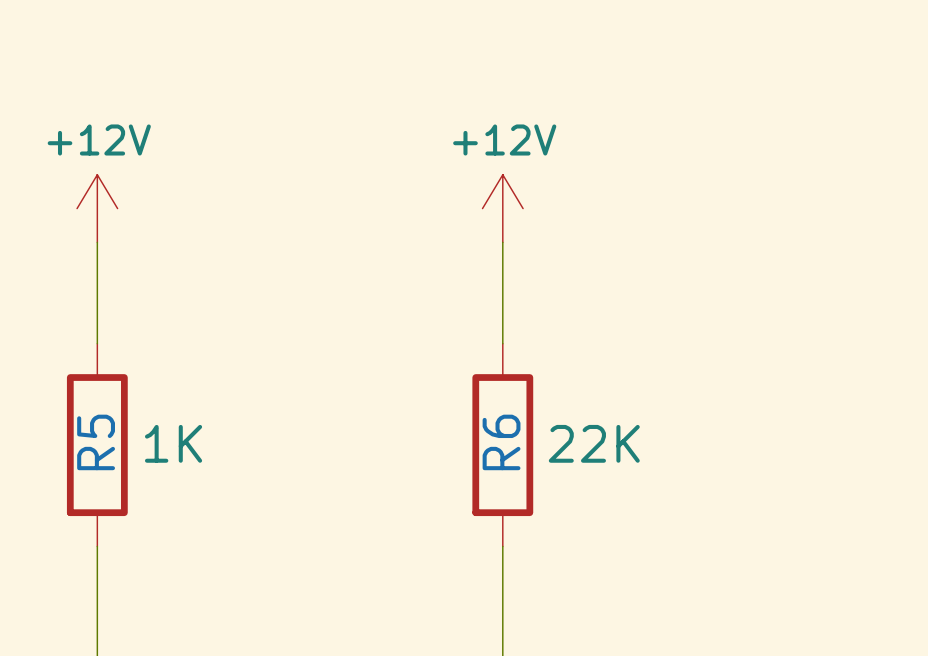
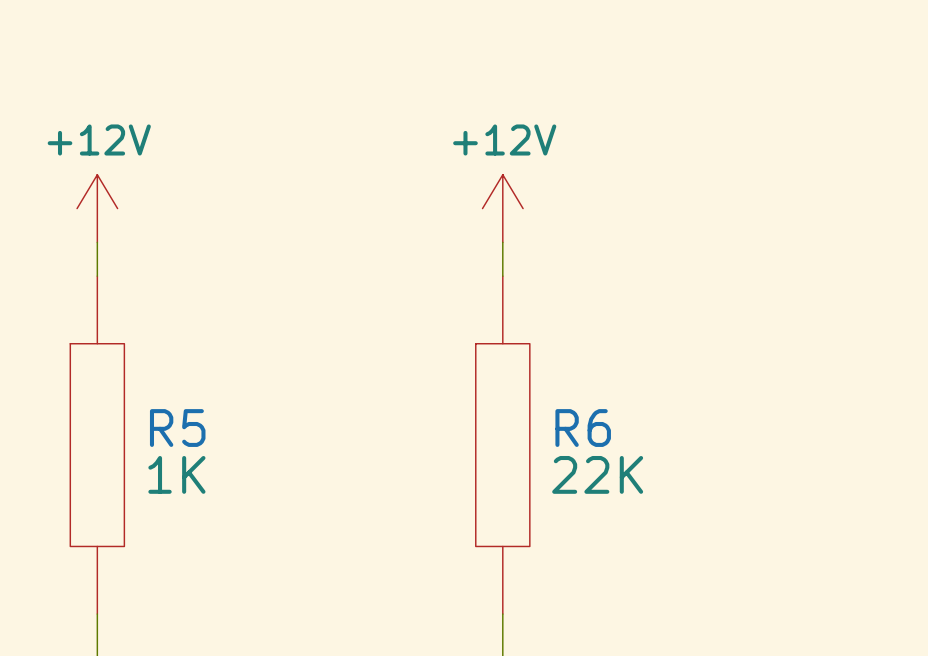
R5 symbol: [66, 343, 128, 547] -> [70, 276, 125, 615]
R6 symbol: [472, 343, 534, 547] -> [475, 276, 530, 615]
R5 name position: R5 (96, 442) -> R5 (177, 428)
R6 name position: R6 (501, 442) -> R6 (583, 428)

